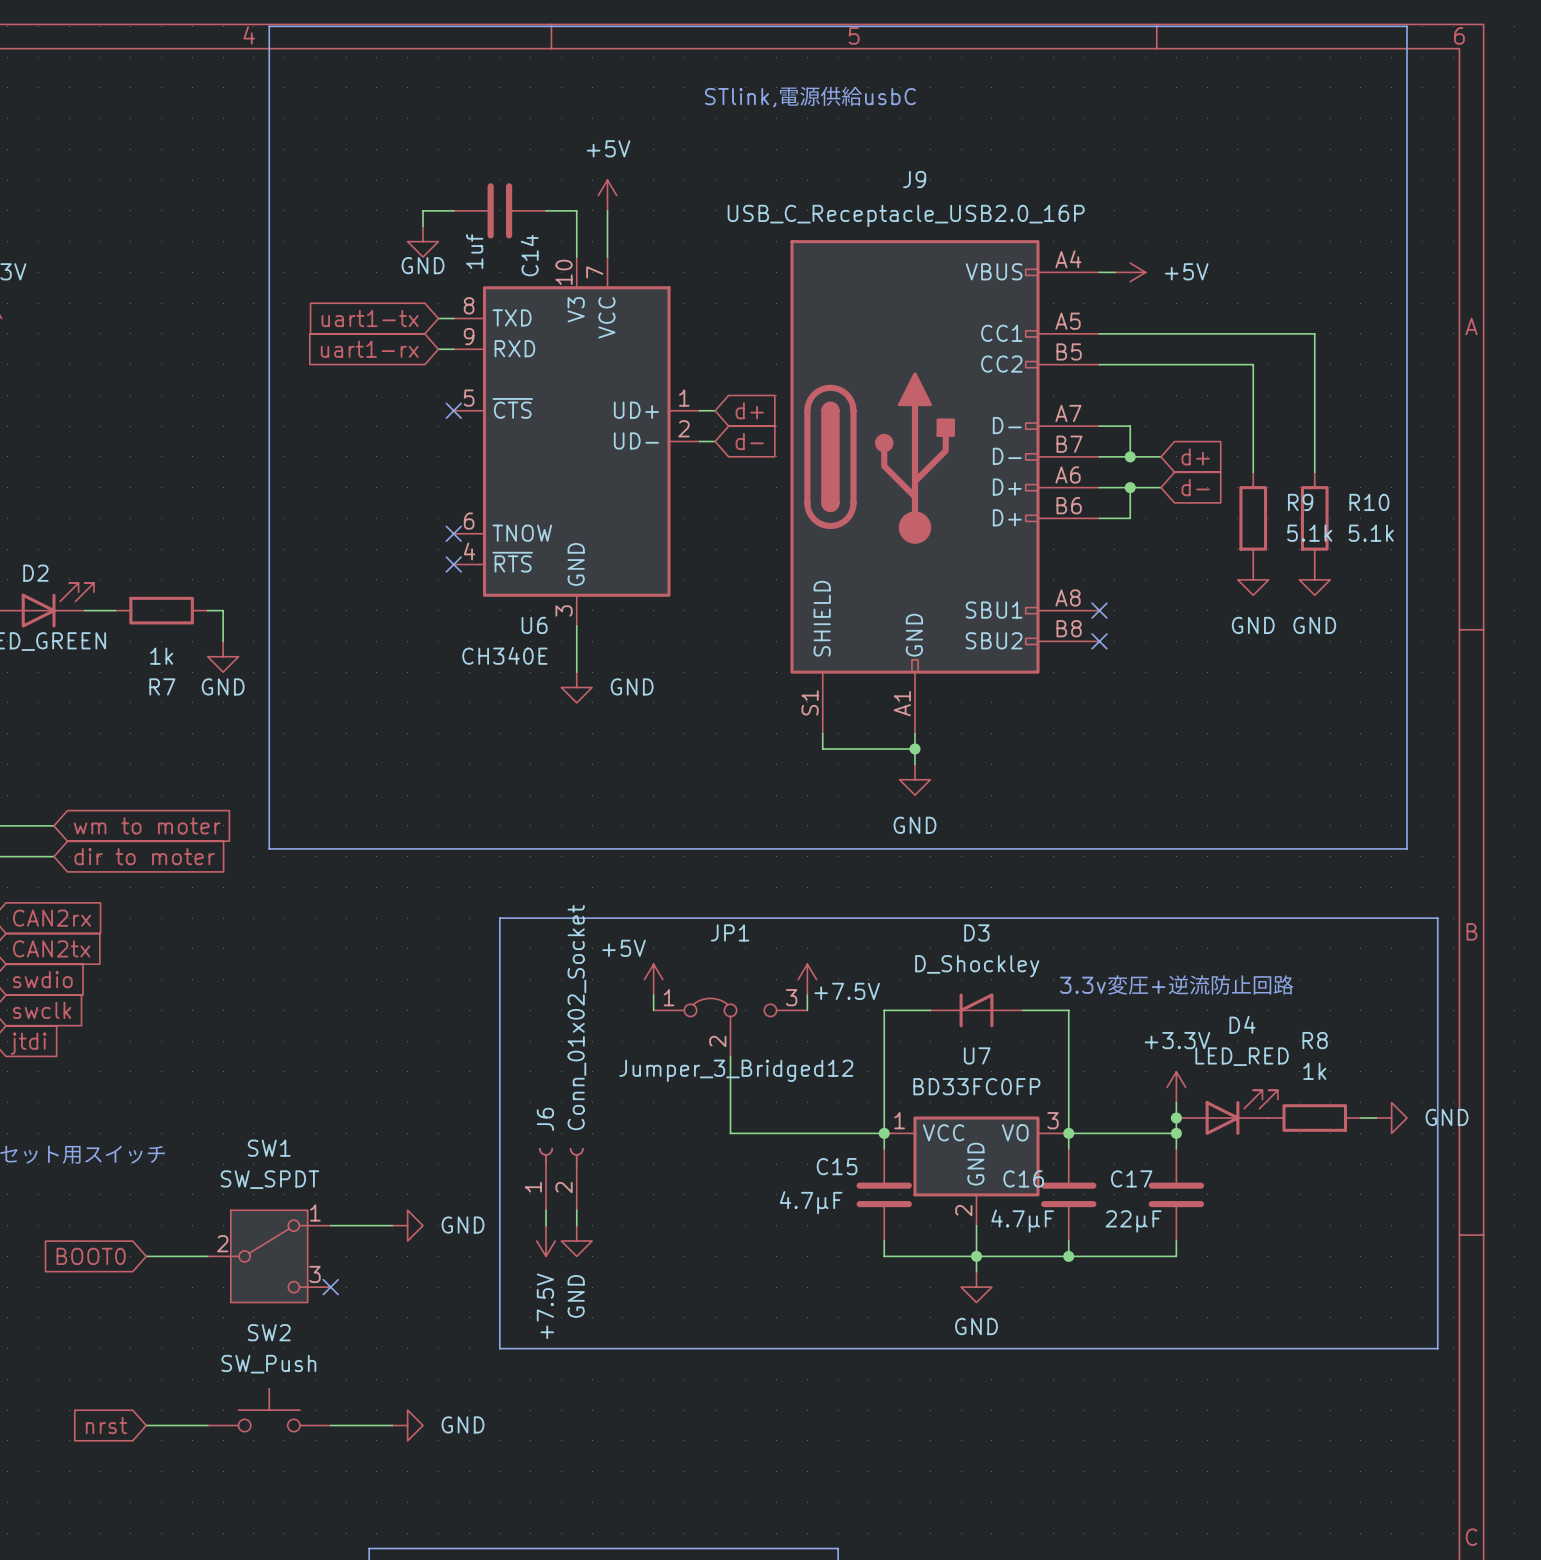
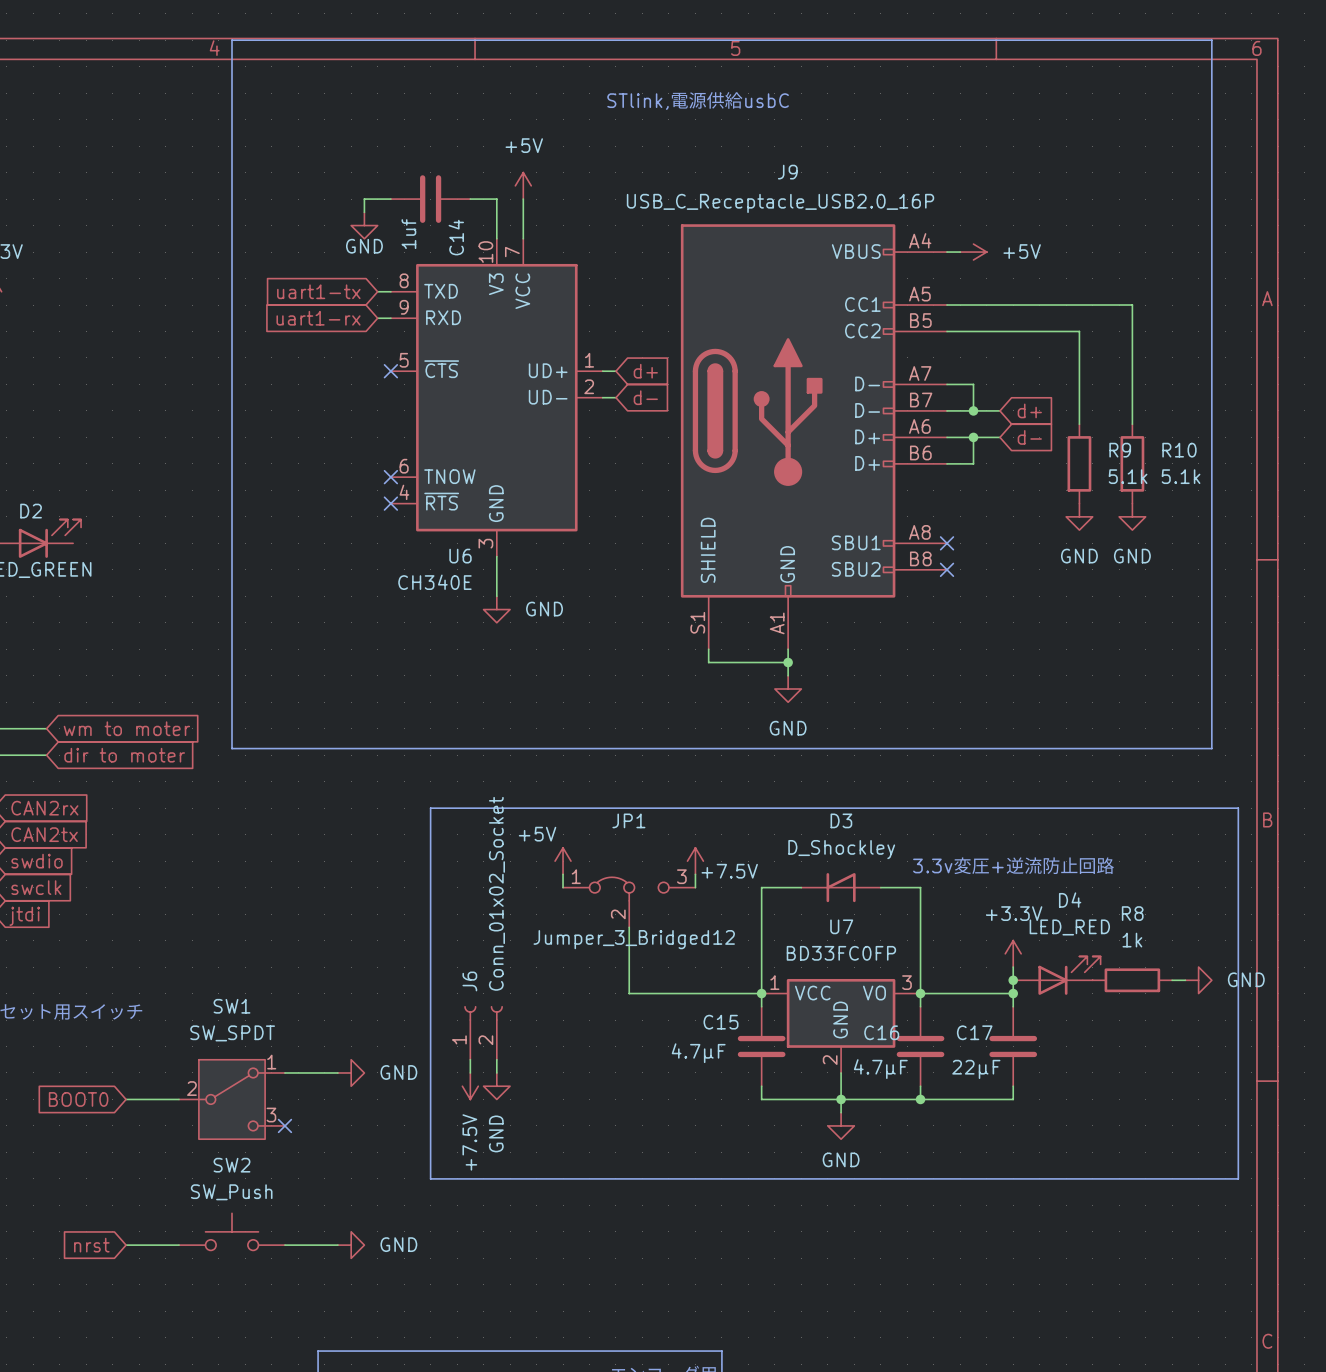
wire: (84, 610) (115, 610) -> none
R7: 1k (161, 610) -> none
wire: (207, 610) (223, 610) (223, 641) -> none
power symbol: GND (223, 656) -> none

